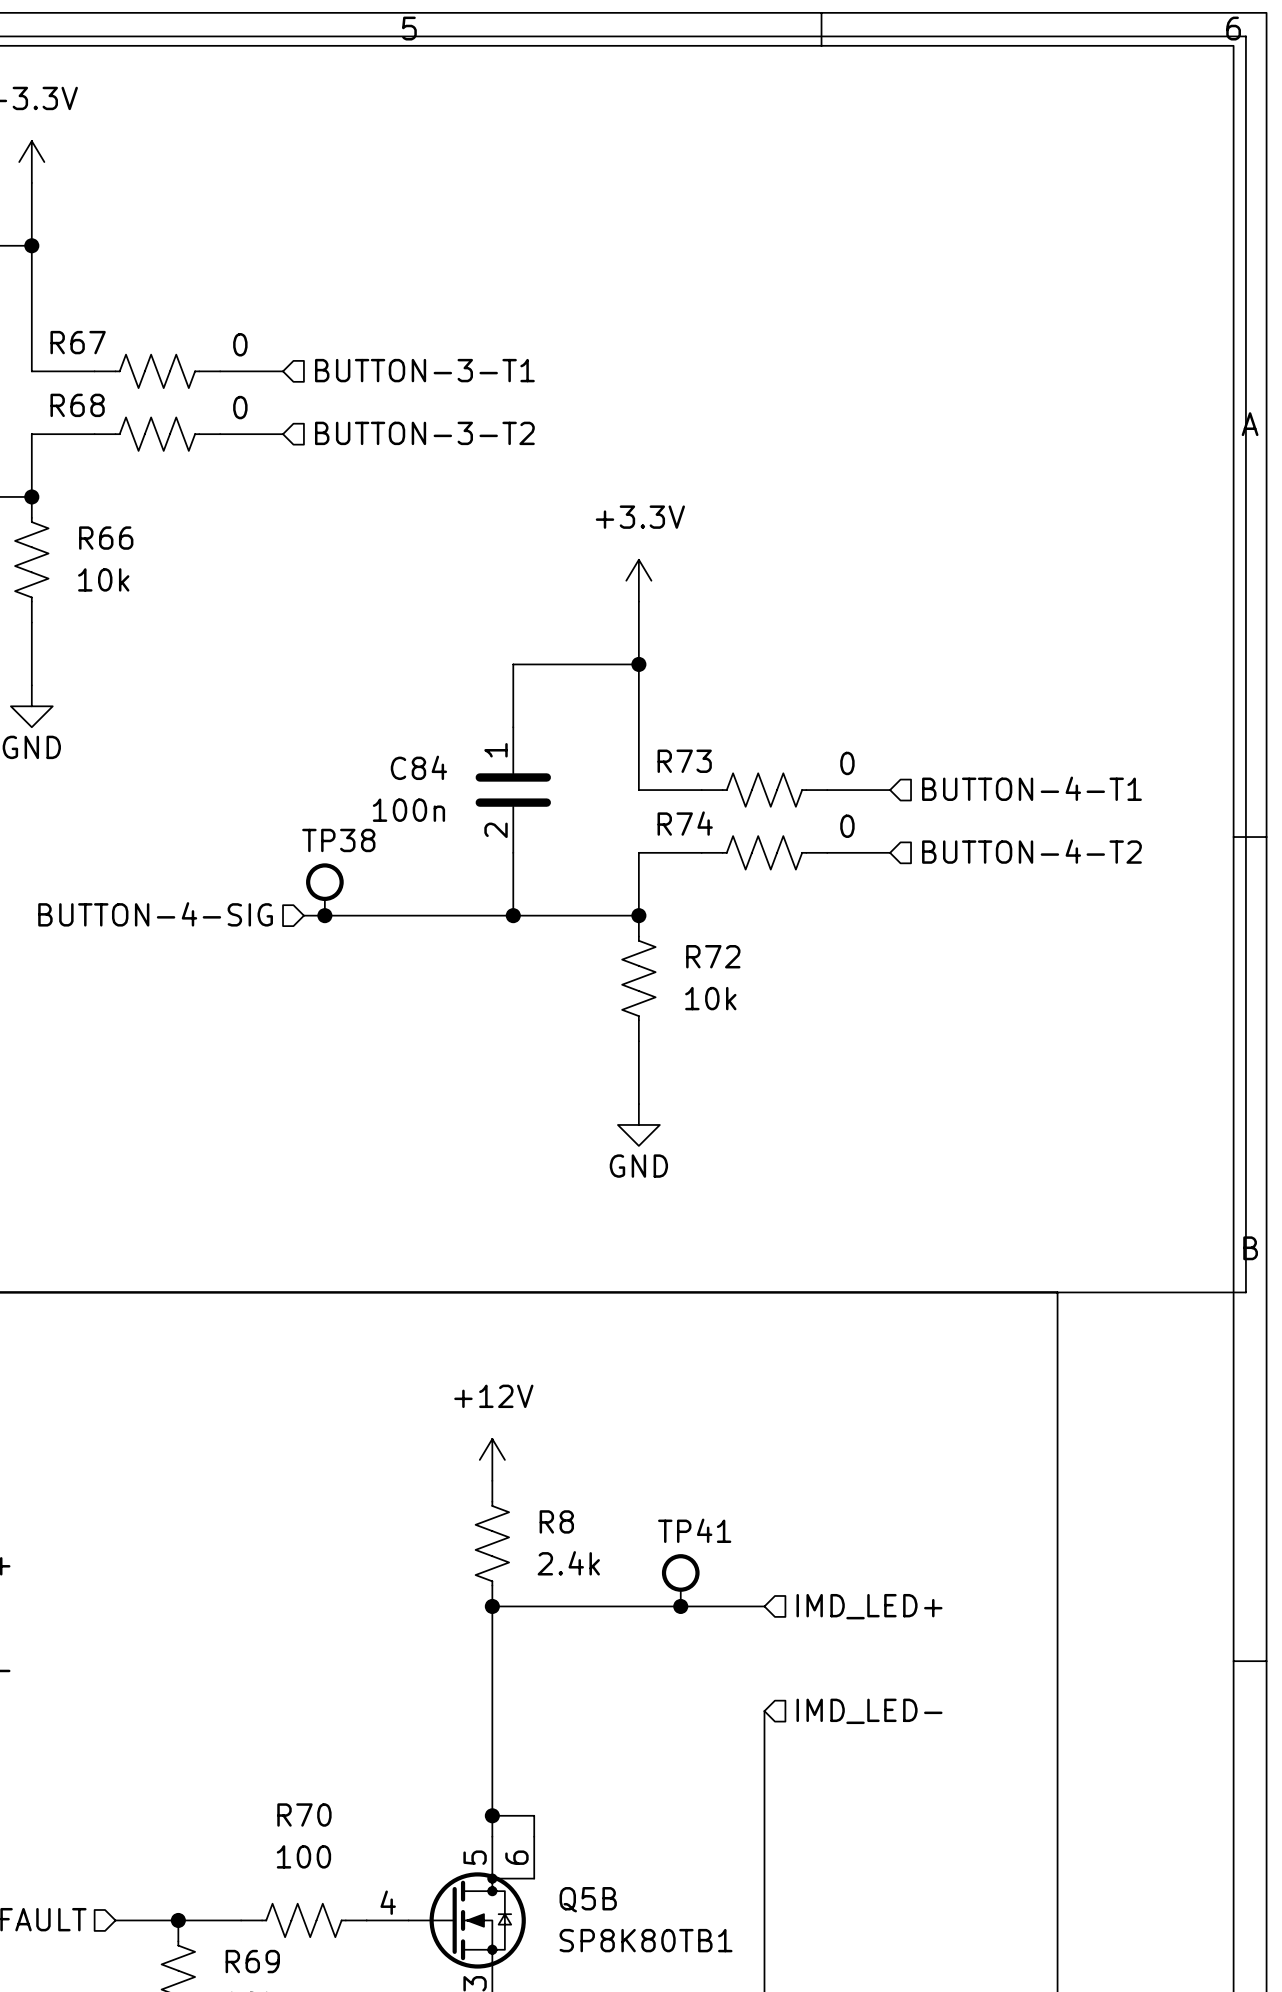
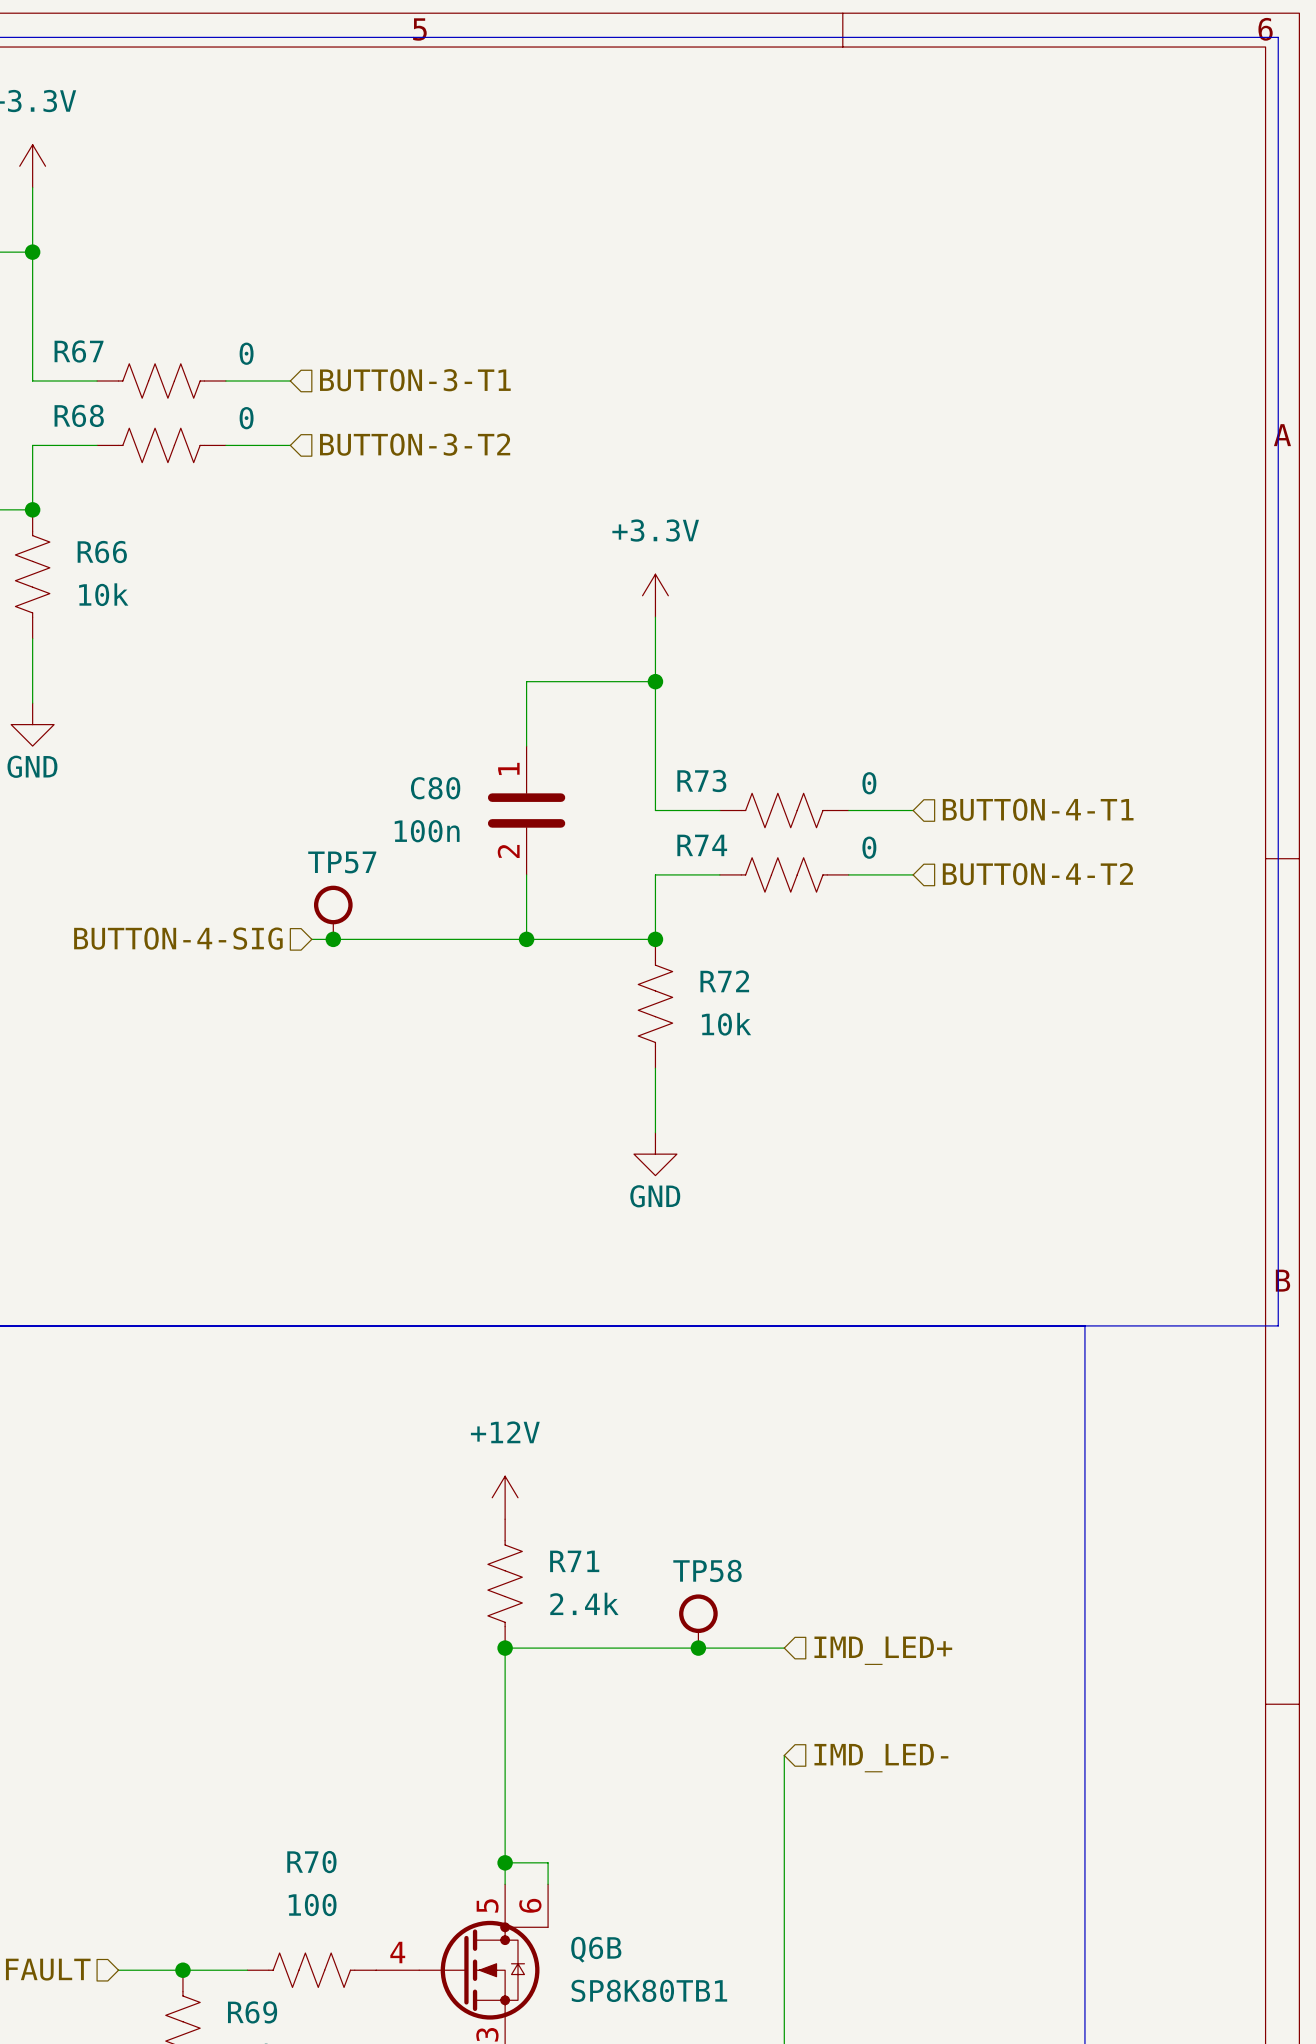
C84 name: C84 (418, 767) -> C80 (435, 788)
TP38 name: TP38 (338, 840) -> TP57 (342, 862)
R8 name: R8 (556, 1521) -> R71 (574, 1561)
TP41 name: TP41 (694, 1530) -> TP58 (707, 1570)
Q5B name: Q5B (588, 1899) -> Q6B (596, 1949)

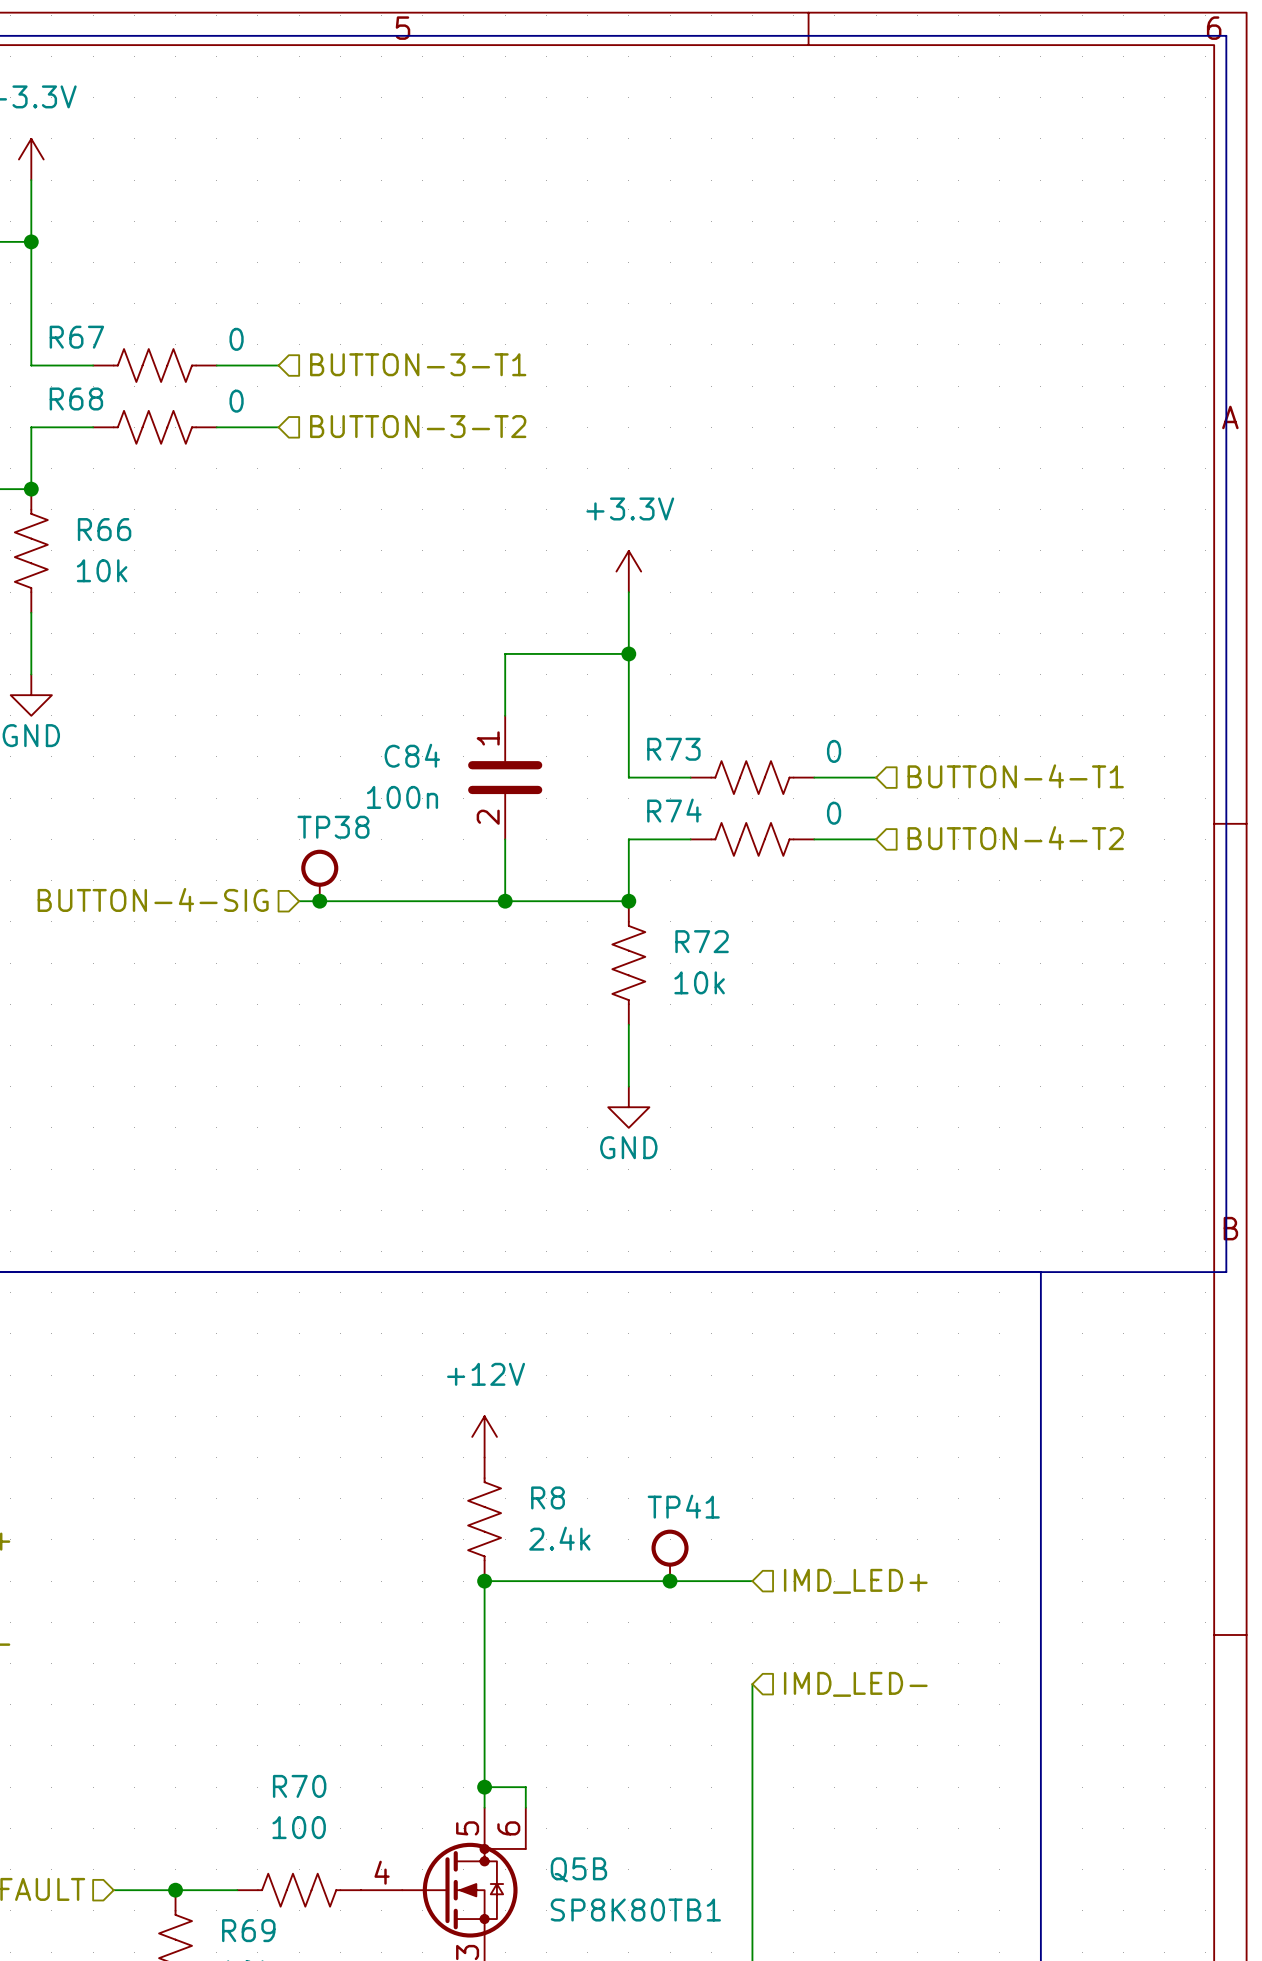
C80 name: C80 (435, 788) -> C84 (412, 755)
TP57 name: TP57 (342, 862) -> TP38 (333, 827)
R71 name: R71 (574, 1561) -> R8 (548, 1497)
TP58 name: TP58 (707, 1570) -> TP41 (683, 1506)
Q6B name: Q6B (596, 1949) -> Q5B (578, 1869)

